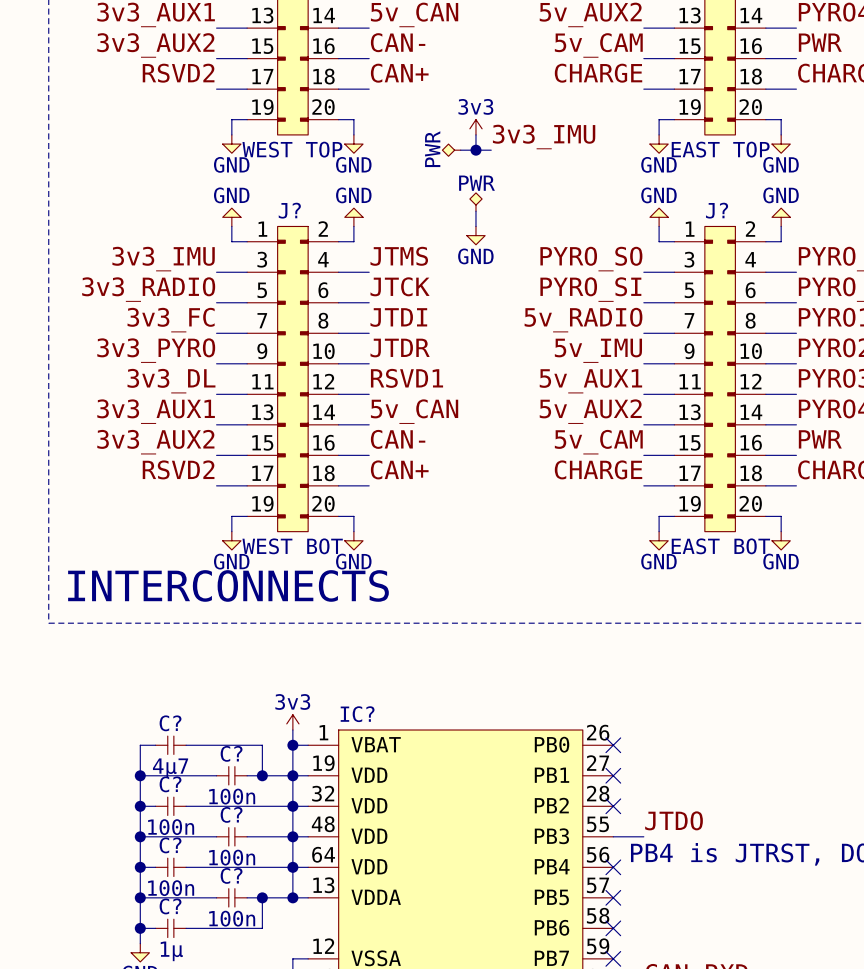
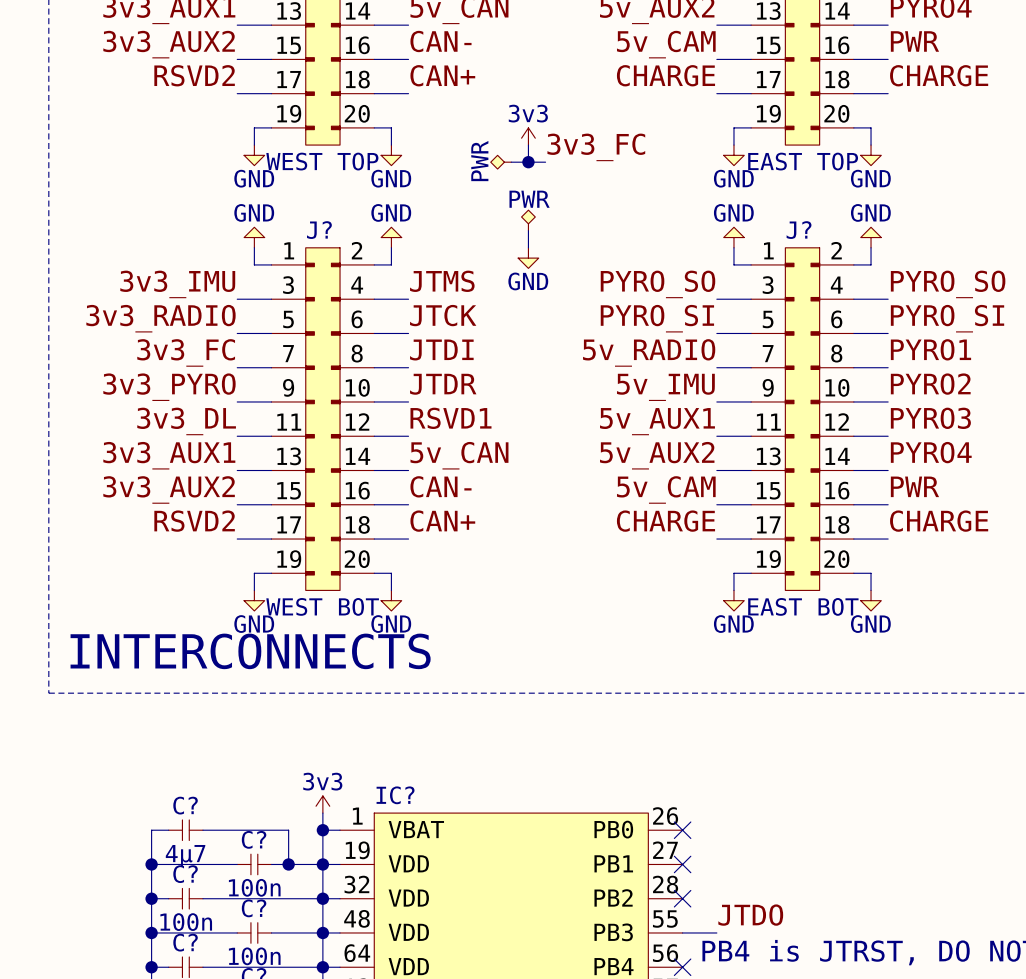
label: 3v3_IMU (544, 137) -> 3v3_FC (596, 147)

